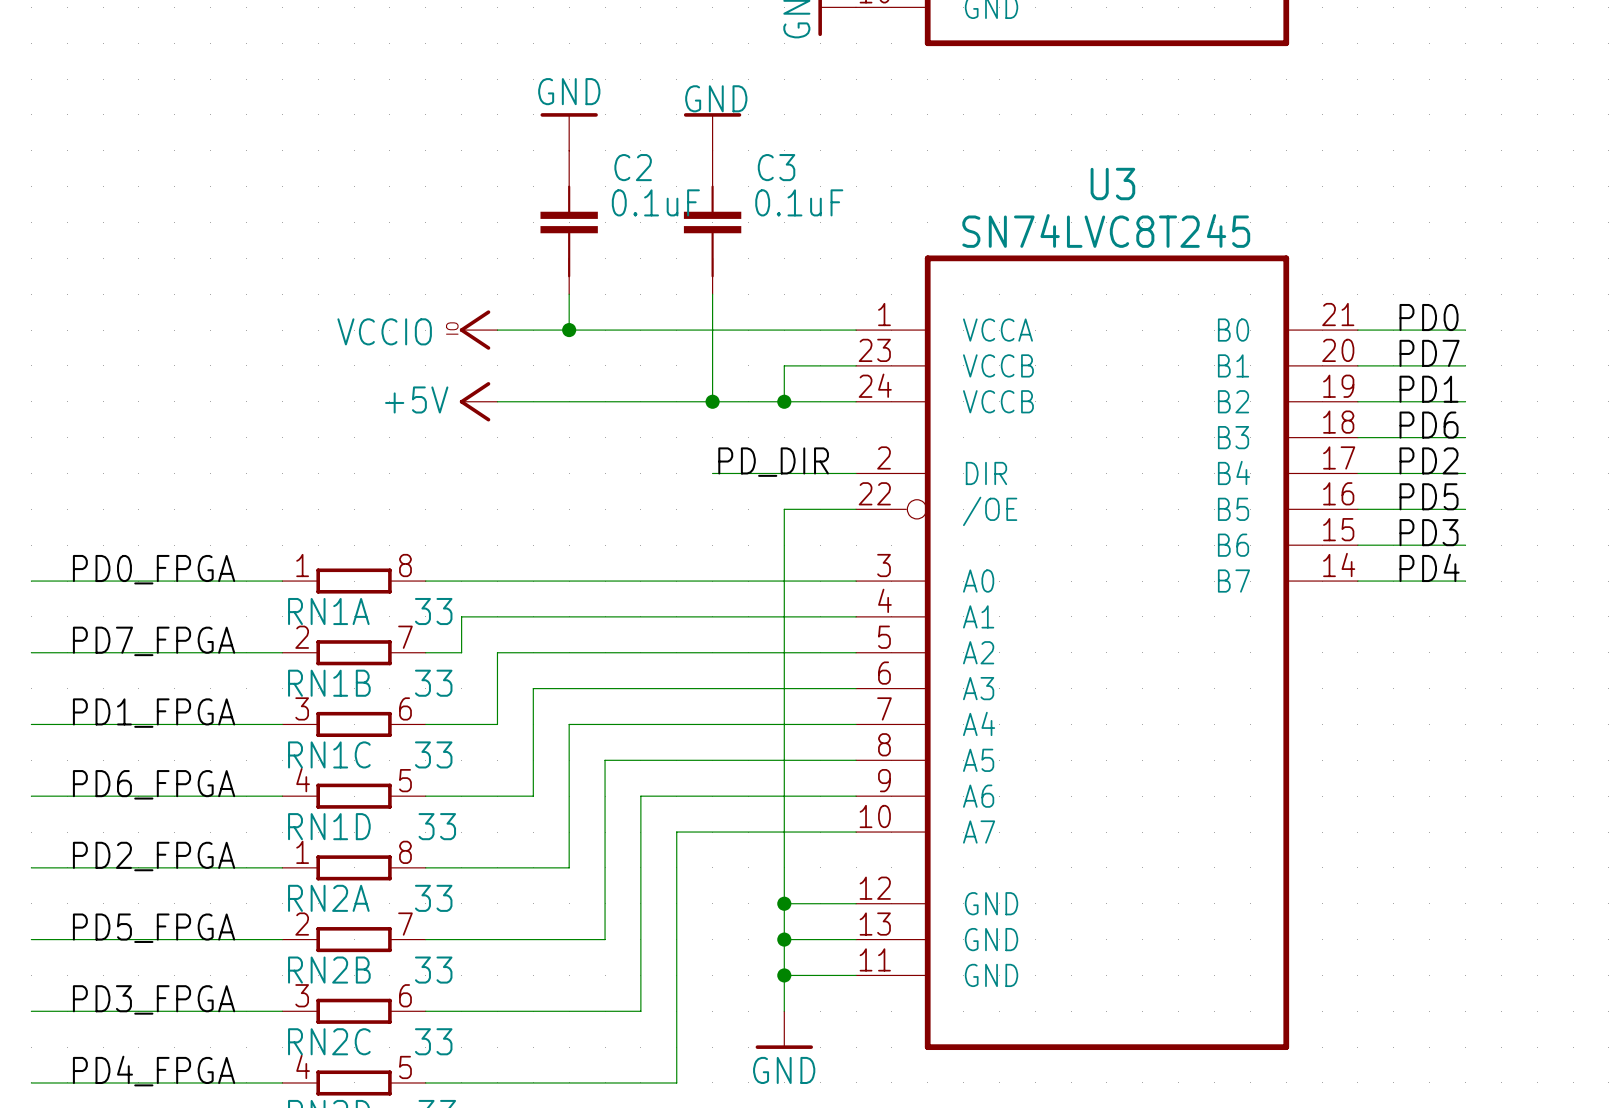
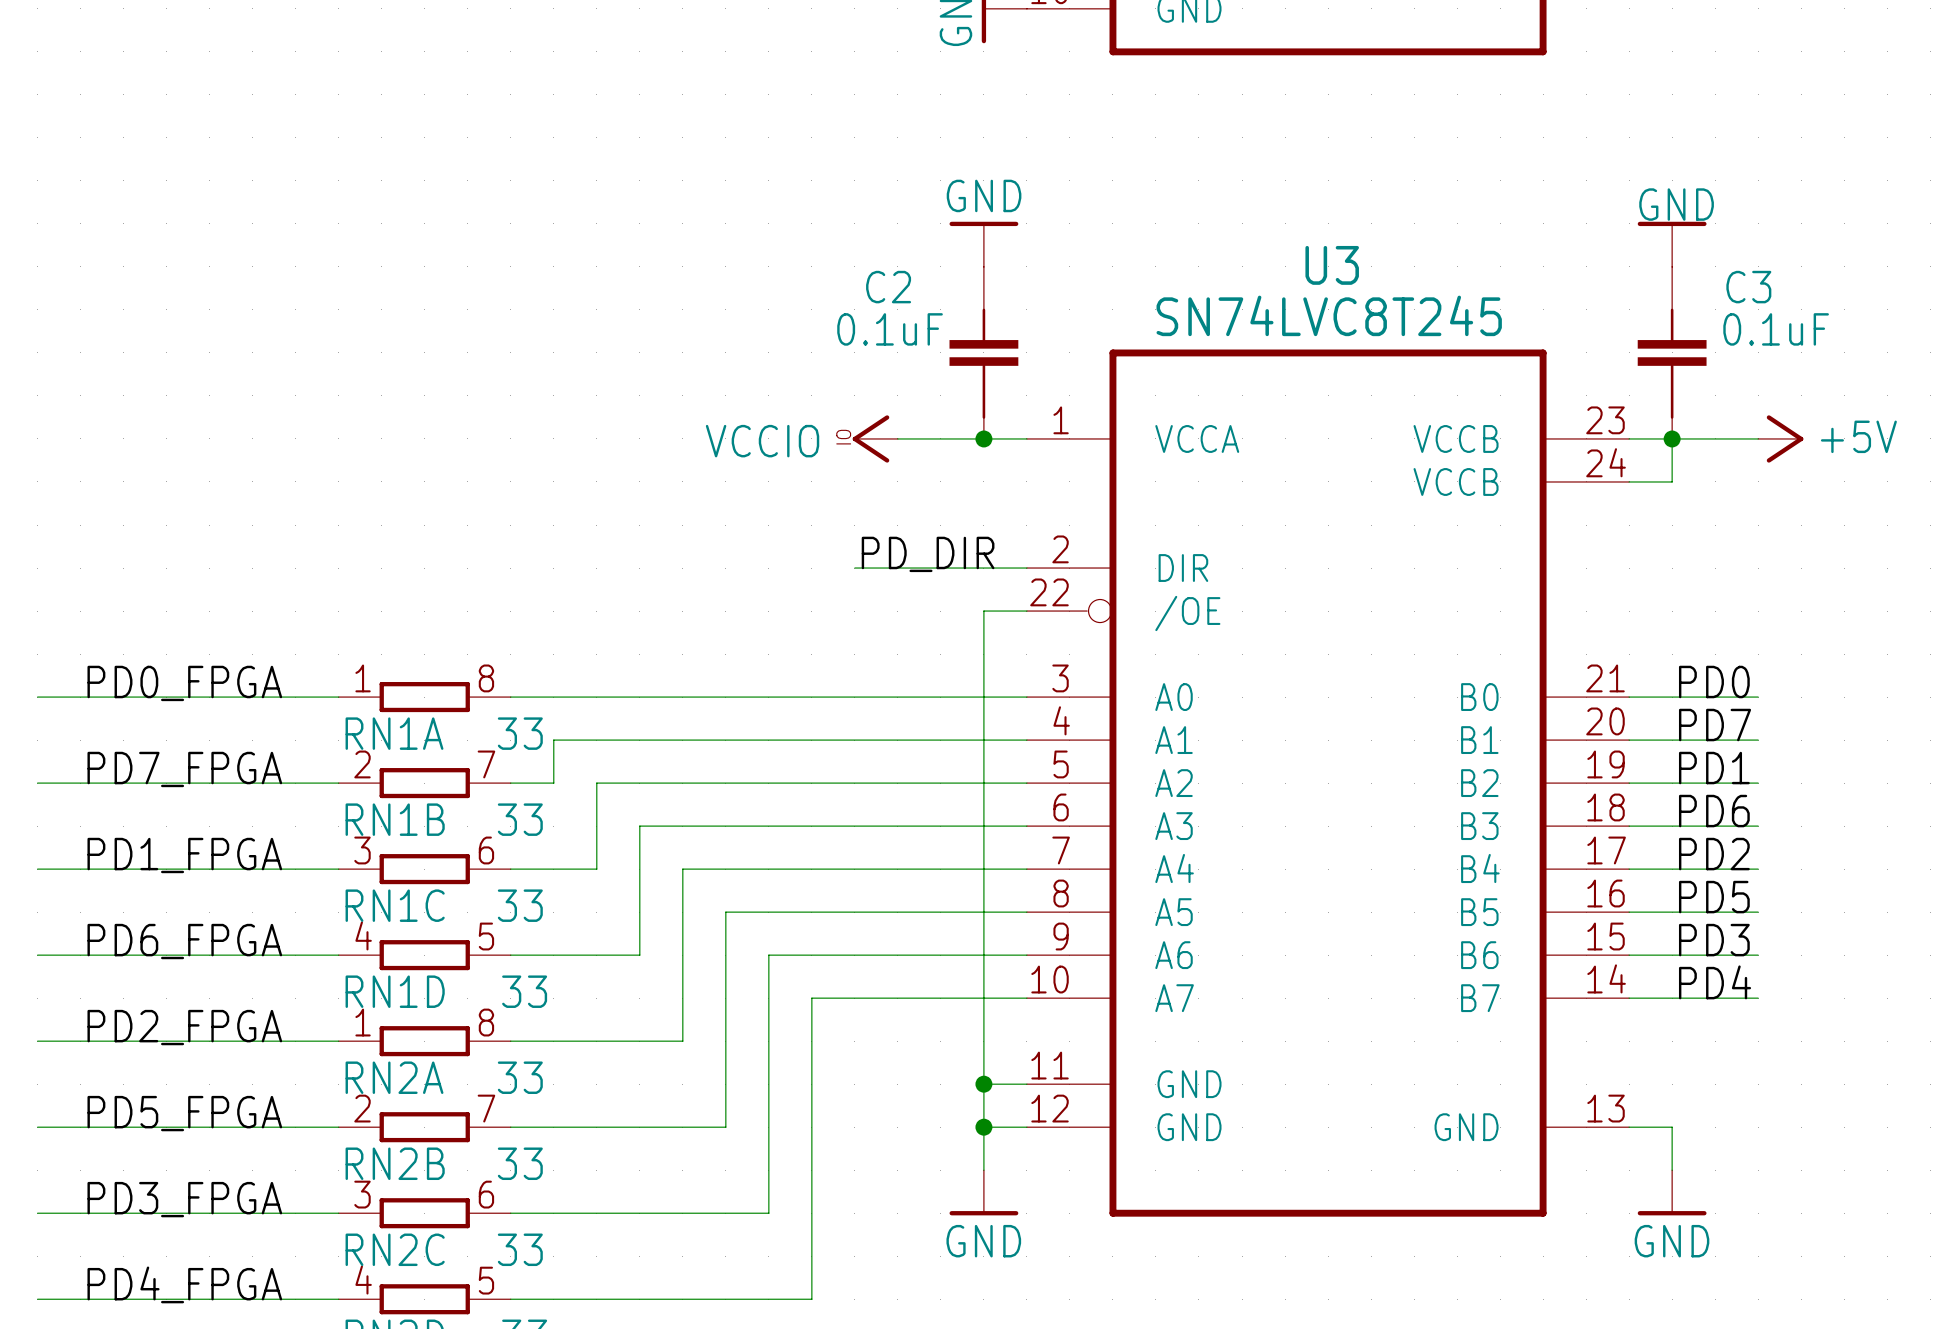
power symbol text position: GND (716, 98) -> GND (984, 195)
power symbol: GND (569, 131) -> none
power symbol position: GND (712, 131) -> GND (983, 244)
C2 name position: C2 (633, 167) -> C2 (888, 287)
U3 name position: U3 (1112, 184) -> U3 (1332, 265)
C2 value position: 0.1uF (655, 202) -> 0.1uF (890, 329)
power symbol: none -> GND (1672, 244)
C2 position: (569, 222) -> (983, 352)
C3 position: (712, 222) -> (1672, 352)
U3 value position: SN74LVC8T245 (1106, 230) -> SN74LVC8T245 (1329, 315)
U3 symbol: [856, 255, 1358, 1051] -> [1026, 349, 1630, 1217]
wire: (569, 294) (569, 330) -> none
wire: (712, 294) (712, 401) -> none
label: PD0 (1429, 317) -> none
power symbol position: VCCIO (478, 330) -> VCCIO (875, 438)
wire: (497, 330) (856, 330) -> none
junction: (569, 330) -> none
wire: (1357, 330) (1465, 330) -> (1629, 740) (1758, 740)
label position: PD7 (1429, 353) -> PD7 (1715, 725)
wire: (784, 365) (784, 401) -> (940, 438) (897, 438)
junction: none -> (1672, 438)
power symbol: none -> +5V (1780, 438)
label position: PD1 (1429, 389) -> PD1 (1714, 768)
power symbol: +5V (478, 401) -> none
wire: (497, 401) (856, 401) -> none
junction: (712, 401) -> none
junction position: (784, 401) -> (983, 438)
wire: (1393, 401) (1465, 401) -> (1672, 481) (1672, 438)
label position: PD6 (1429, 425) -> PD6 (1714, 811)
wire: (1357, 437) (1465, 437) -> (1629, 869) (1758, 869)
label position: PD2 (1429, 460) -> PD2 (1714, 854)
wire: (1357, 473) (1465, 473) -> (1629, 912) (1758, 912)
label position: PD5 (1429, 496) -> PD5 (1714, 897)
wire: (820, 509) (784, 509) (784, 1011) -> (983, 611) (983, 1170)
wire: (1357, 509) (1465, 509) -> (1629, 955) (1758, 955)
label position: PD3 (1429, 532) -> PD3 (1714, 940)
wire: (1357, 545) (1465, 545) -> (1629, 998) (1758, 998)
label: PD4 (1429, 567) -> PD0 (1714, 682)
wire: none -> (1629, 783) (1758, 783)
wire: none -> (1629, 826) (1758, 826)
label: none -> PD4 (1715, 982)
wire: (784, 903) (820, 903) -> none
junction: (784, 903) -> none
junction: none -> (983, 1084)
wire: (784, 939) (820, 939) -> none
junction: (784, 939) -> none
junction: none -> (983, 1127)
wire: none -> (1629, 1127) (1672, 1127) (1672, 1170)
wire: (784, 975) (856, 975) -> none
junction: (784, 975) -> none
power symbol: none -> GND (1672, 1192)
power symbol position: GND (784, 1030) -> GND (983, 1192)

